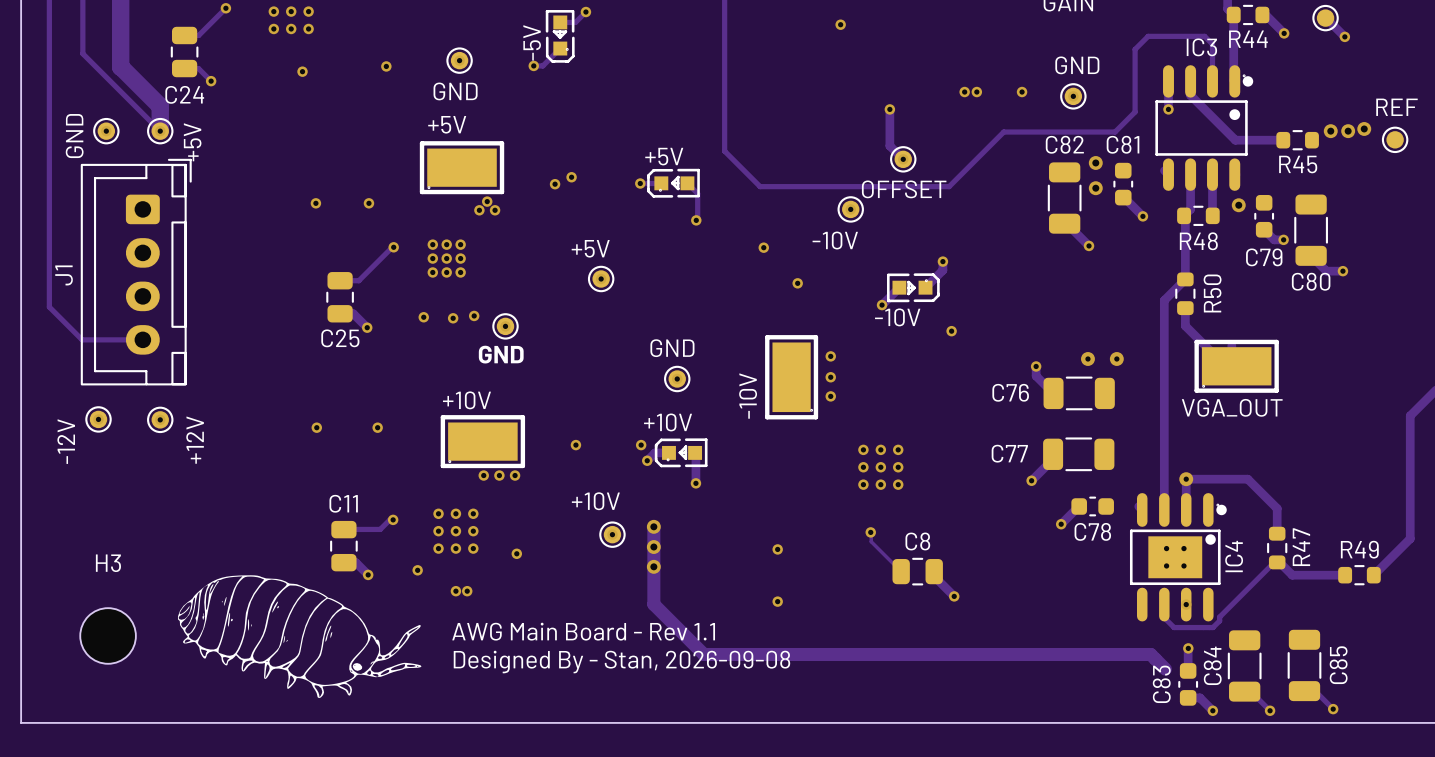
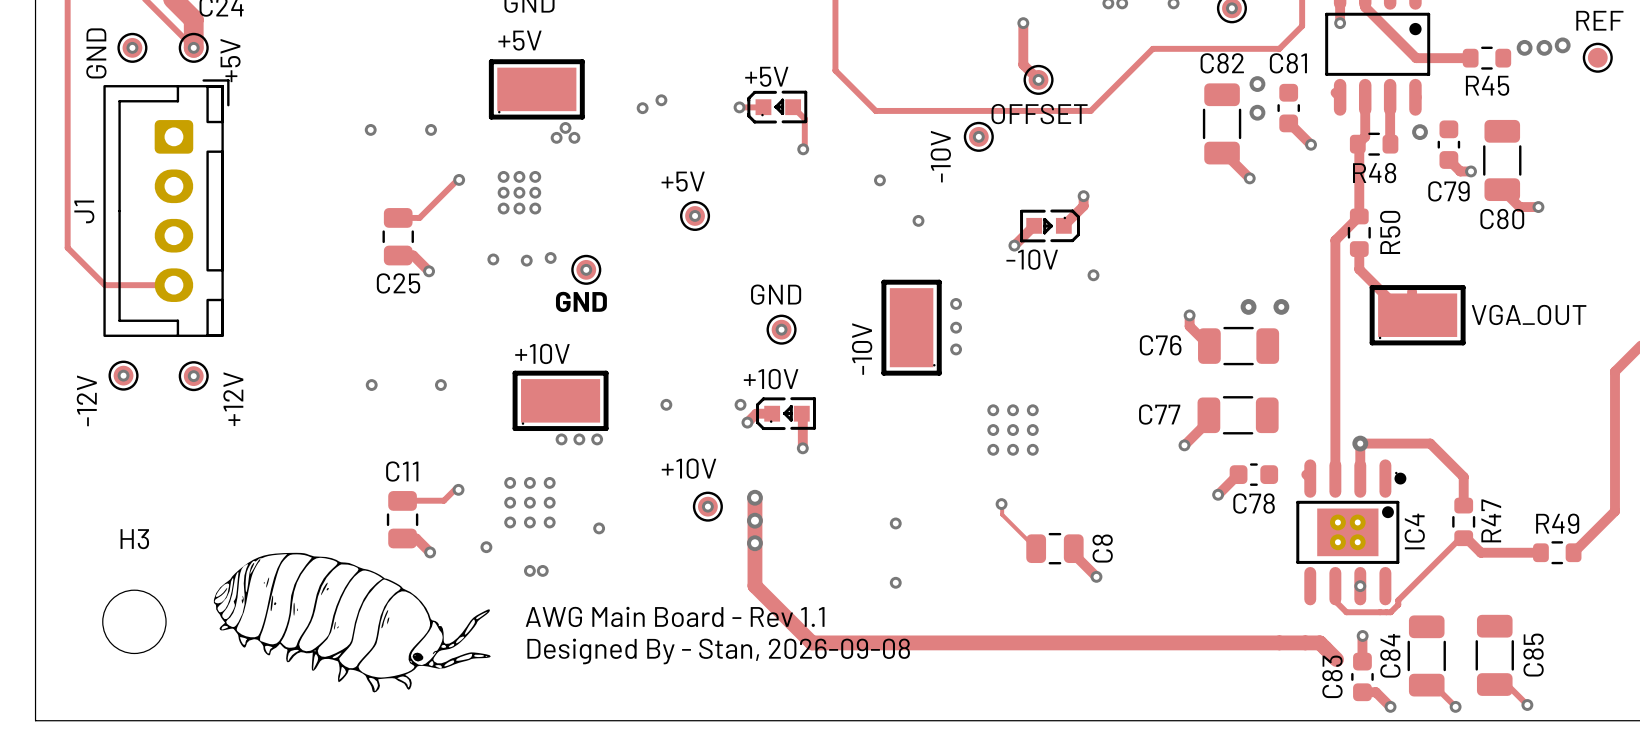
text rotation: 0° (835, 240) -> 90° counterclockwise (940, 156)
text position: VGA_OUT (1232, 407) -> VGA_OUT (1529, 314)
C8 name rotation: 0° (917, 541) -> 90° counterclockwise (1102, 548)
C8 name position: C8 (917, 541) -> C8 (1102, 548)

